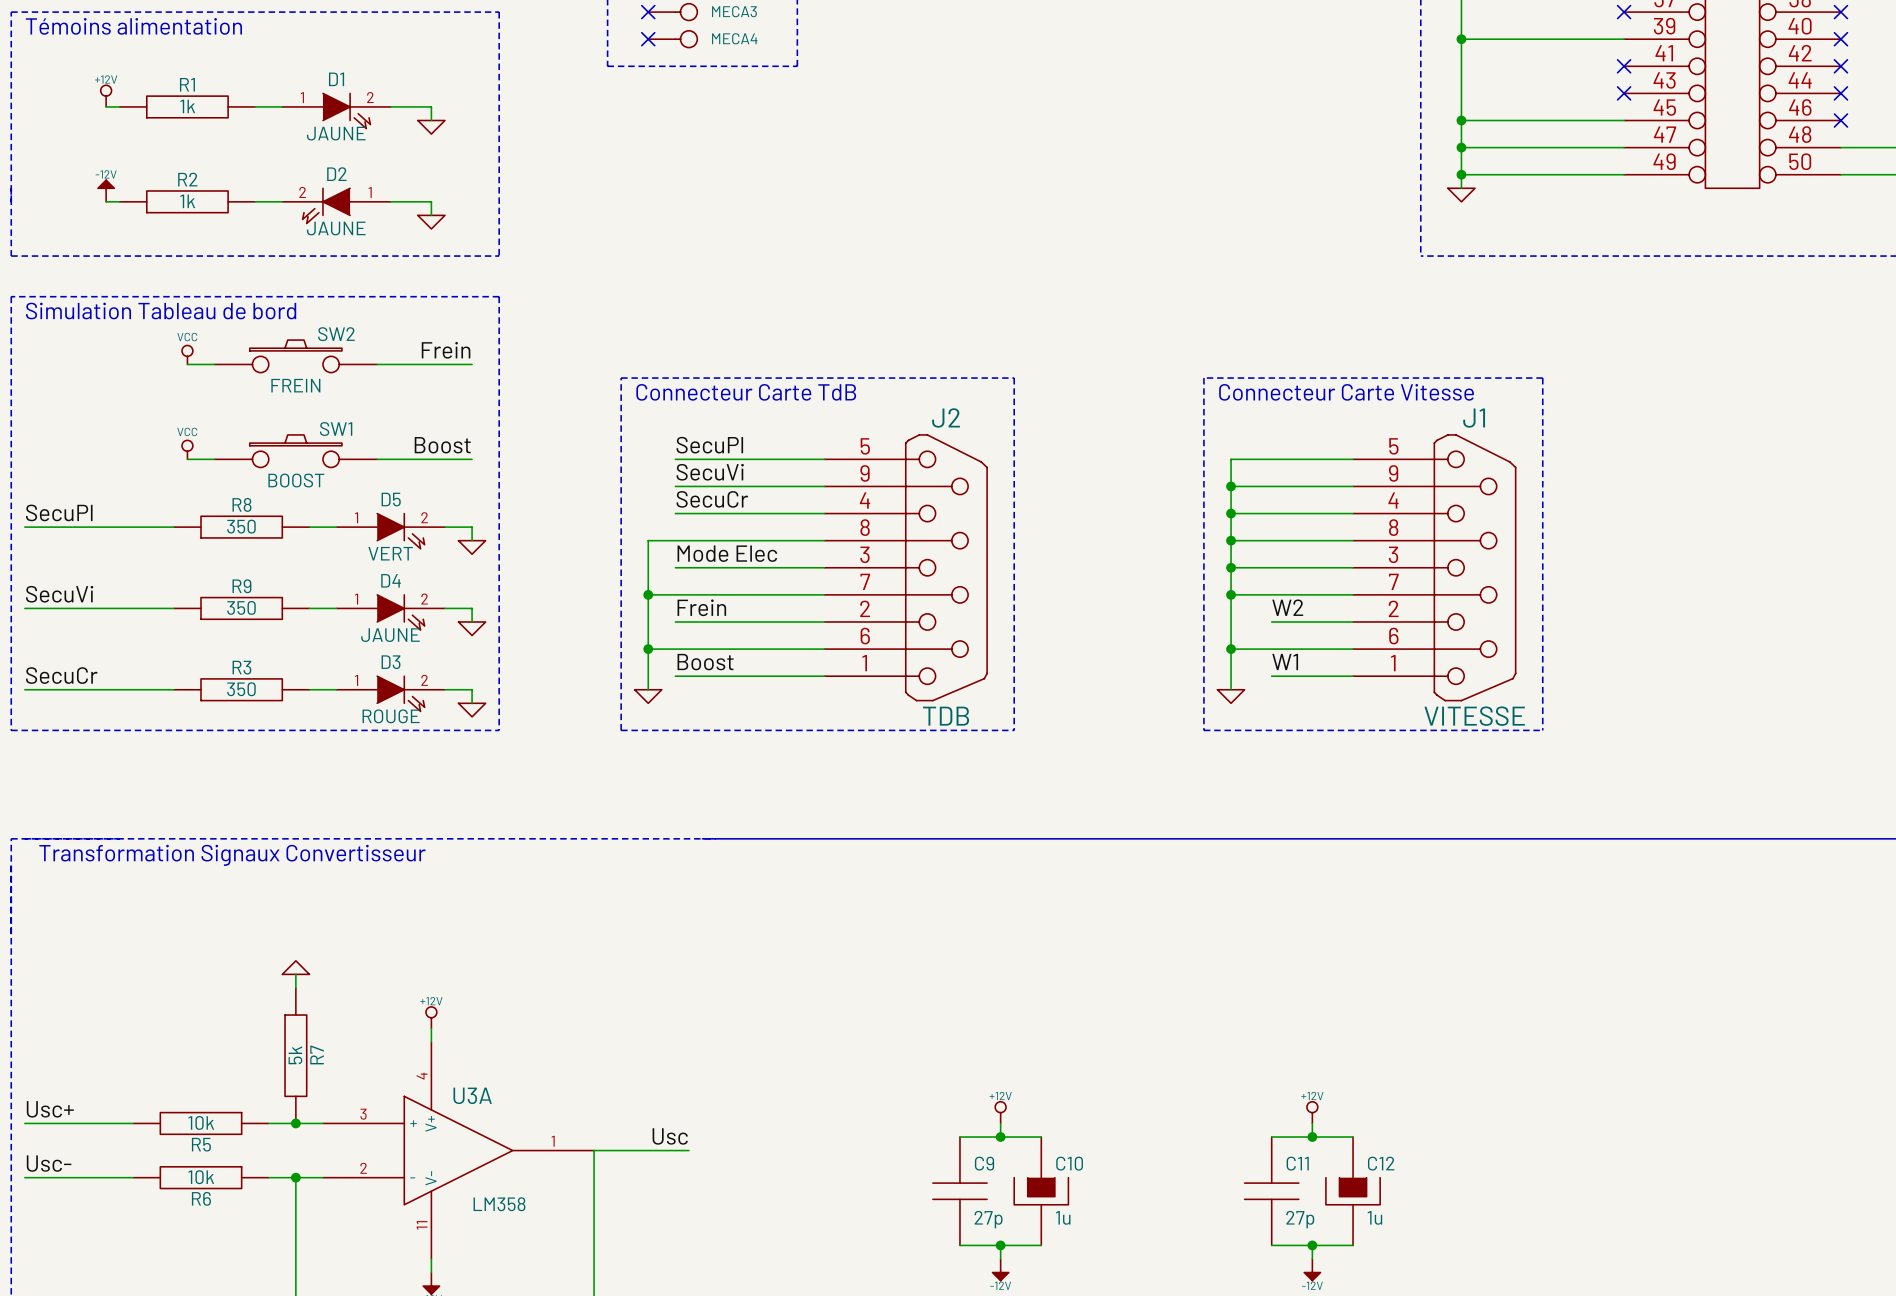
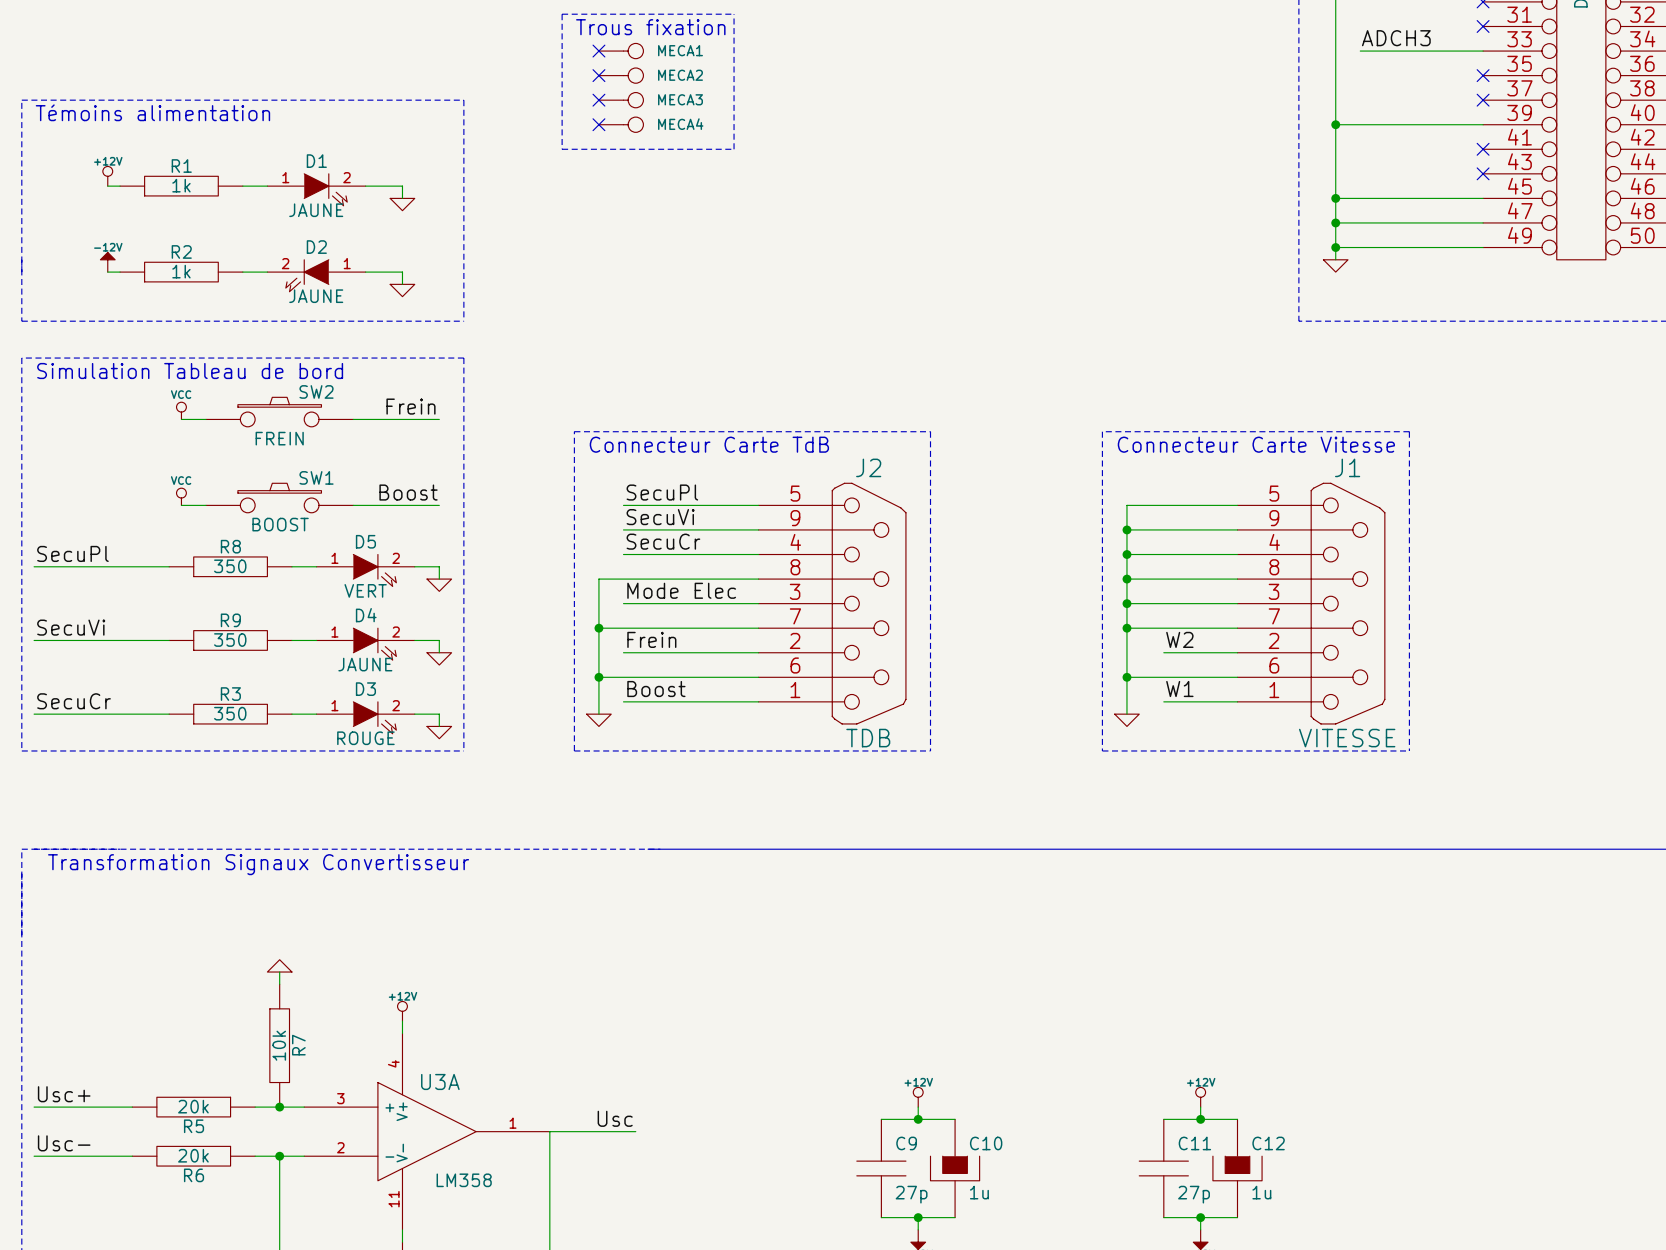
R7 value: 5k (295, 1055) -> 10k (279, 1045)
R5 value: 10k (201, 1122) -> 20k (193, 1106)
R6 value: 10k (201, 1177) -> 20k (193, 1155)

